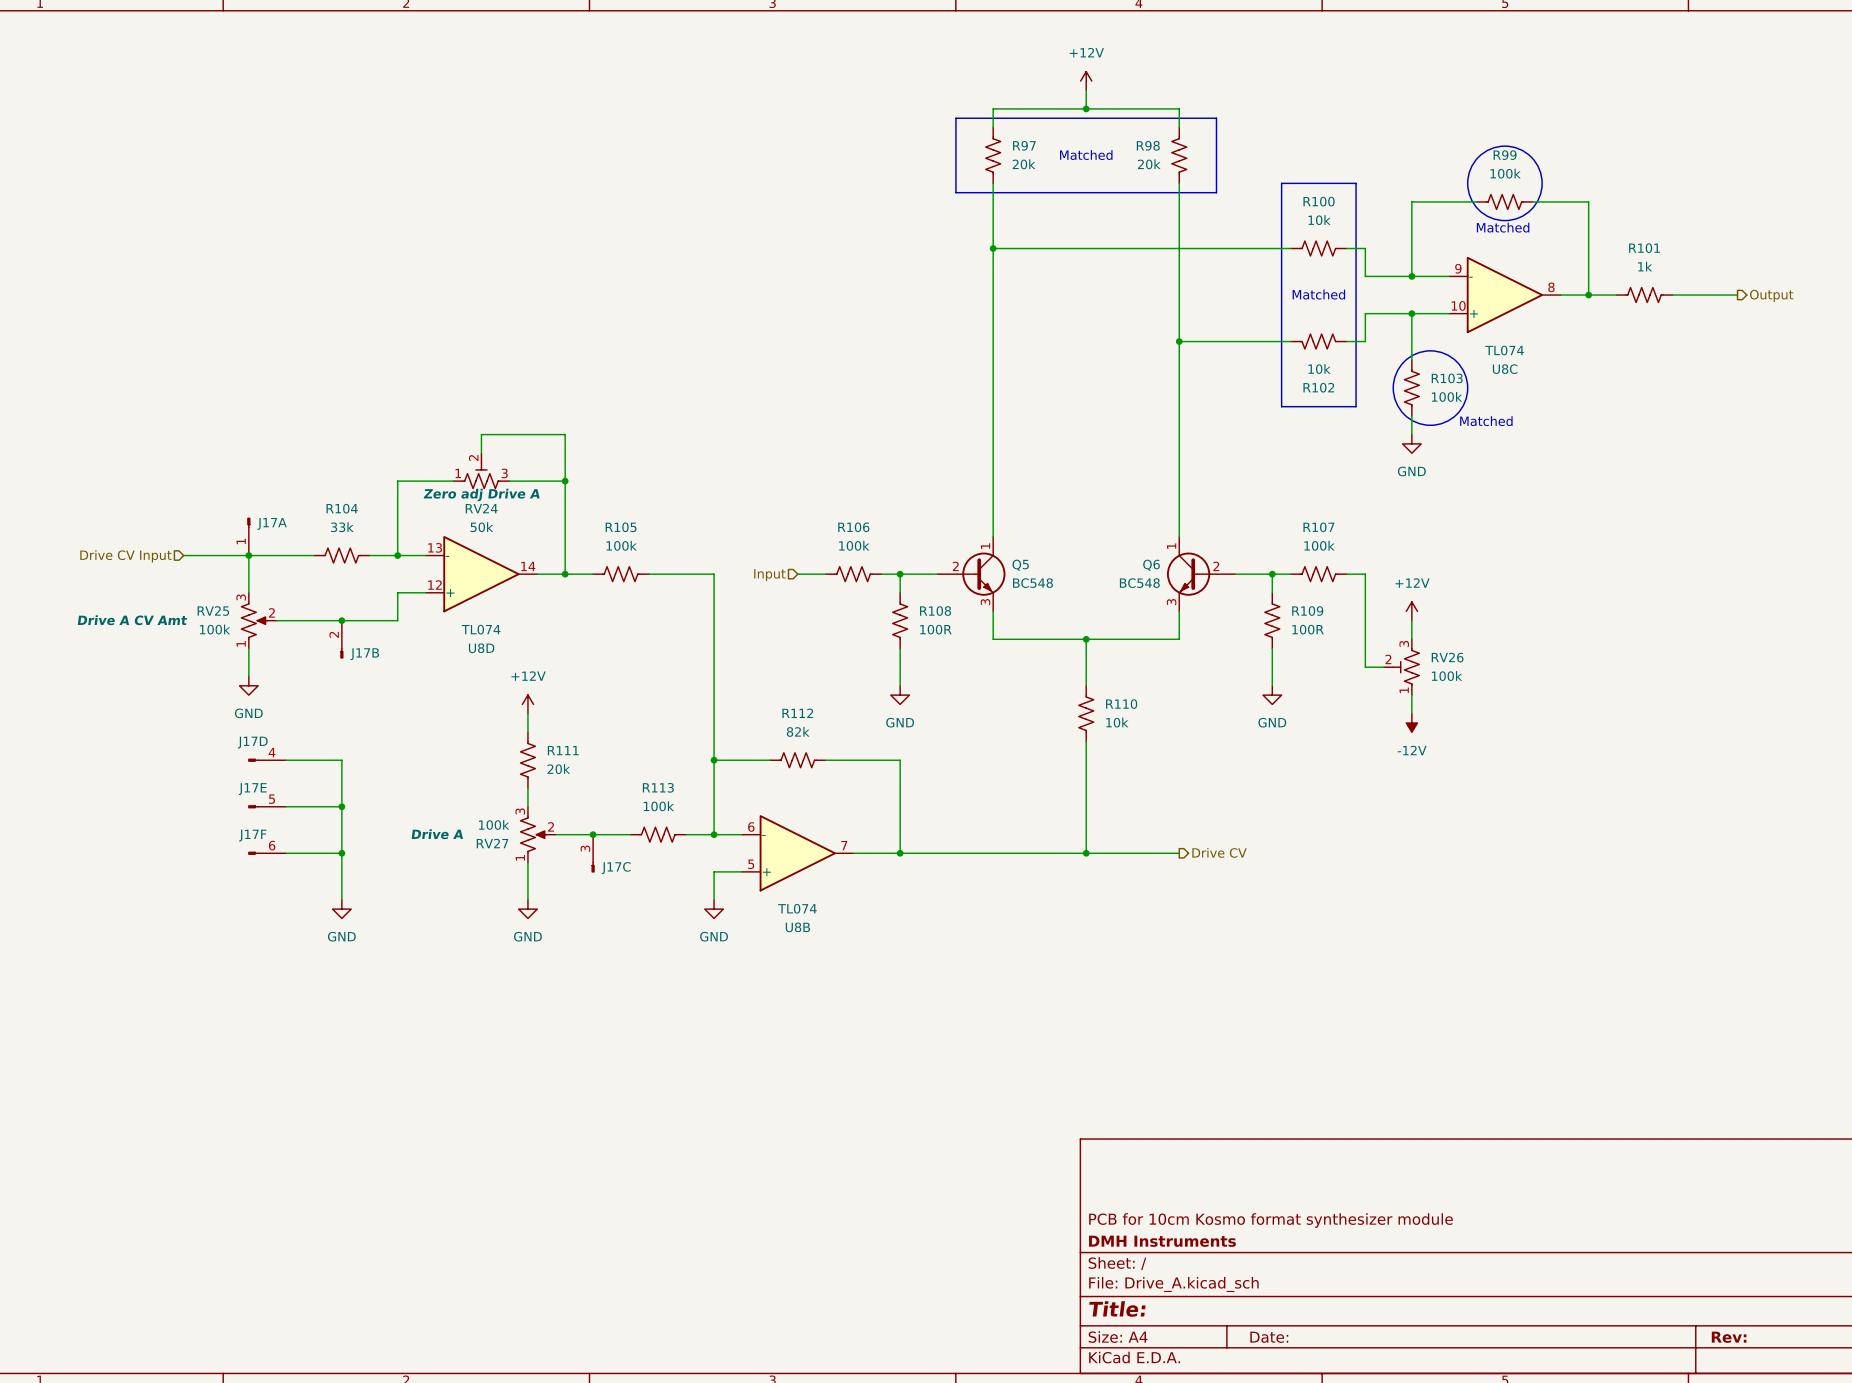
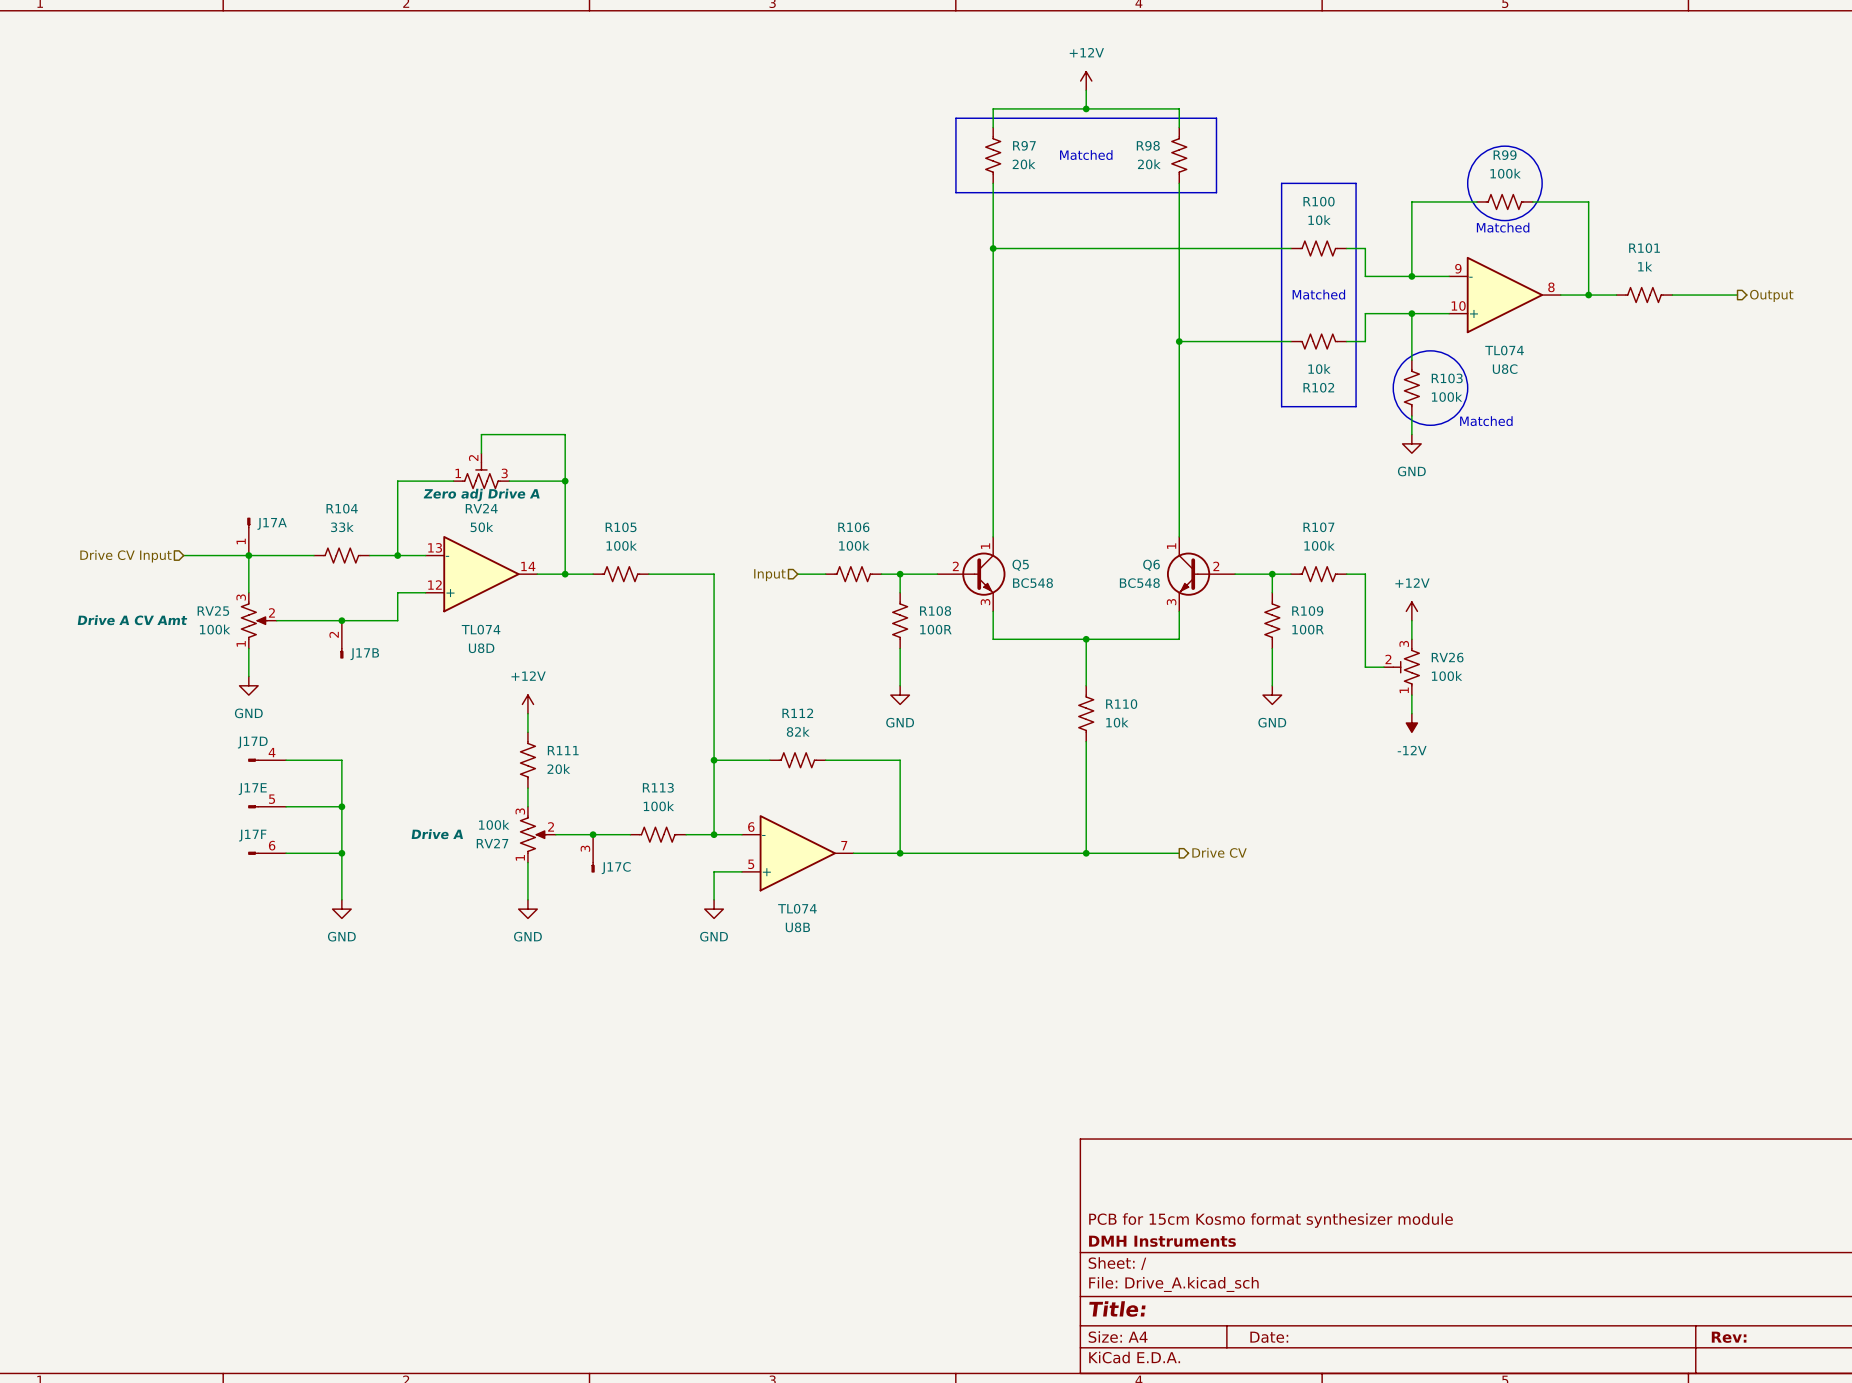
title block: PCB for 10cm Kosmo format synthesizer module (1271, 1220) -> PCB for 15cm Kosmo format synthesizer module (1271, 1220)

